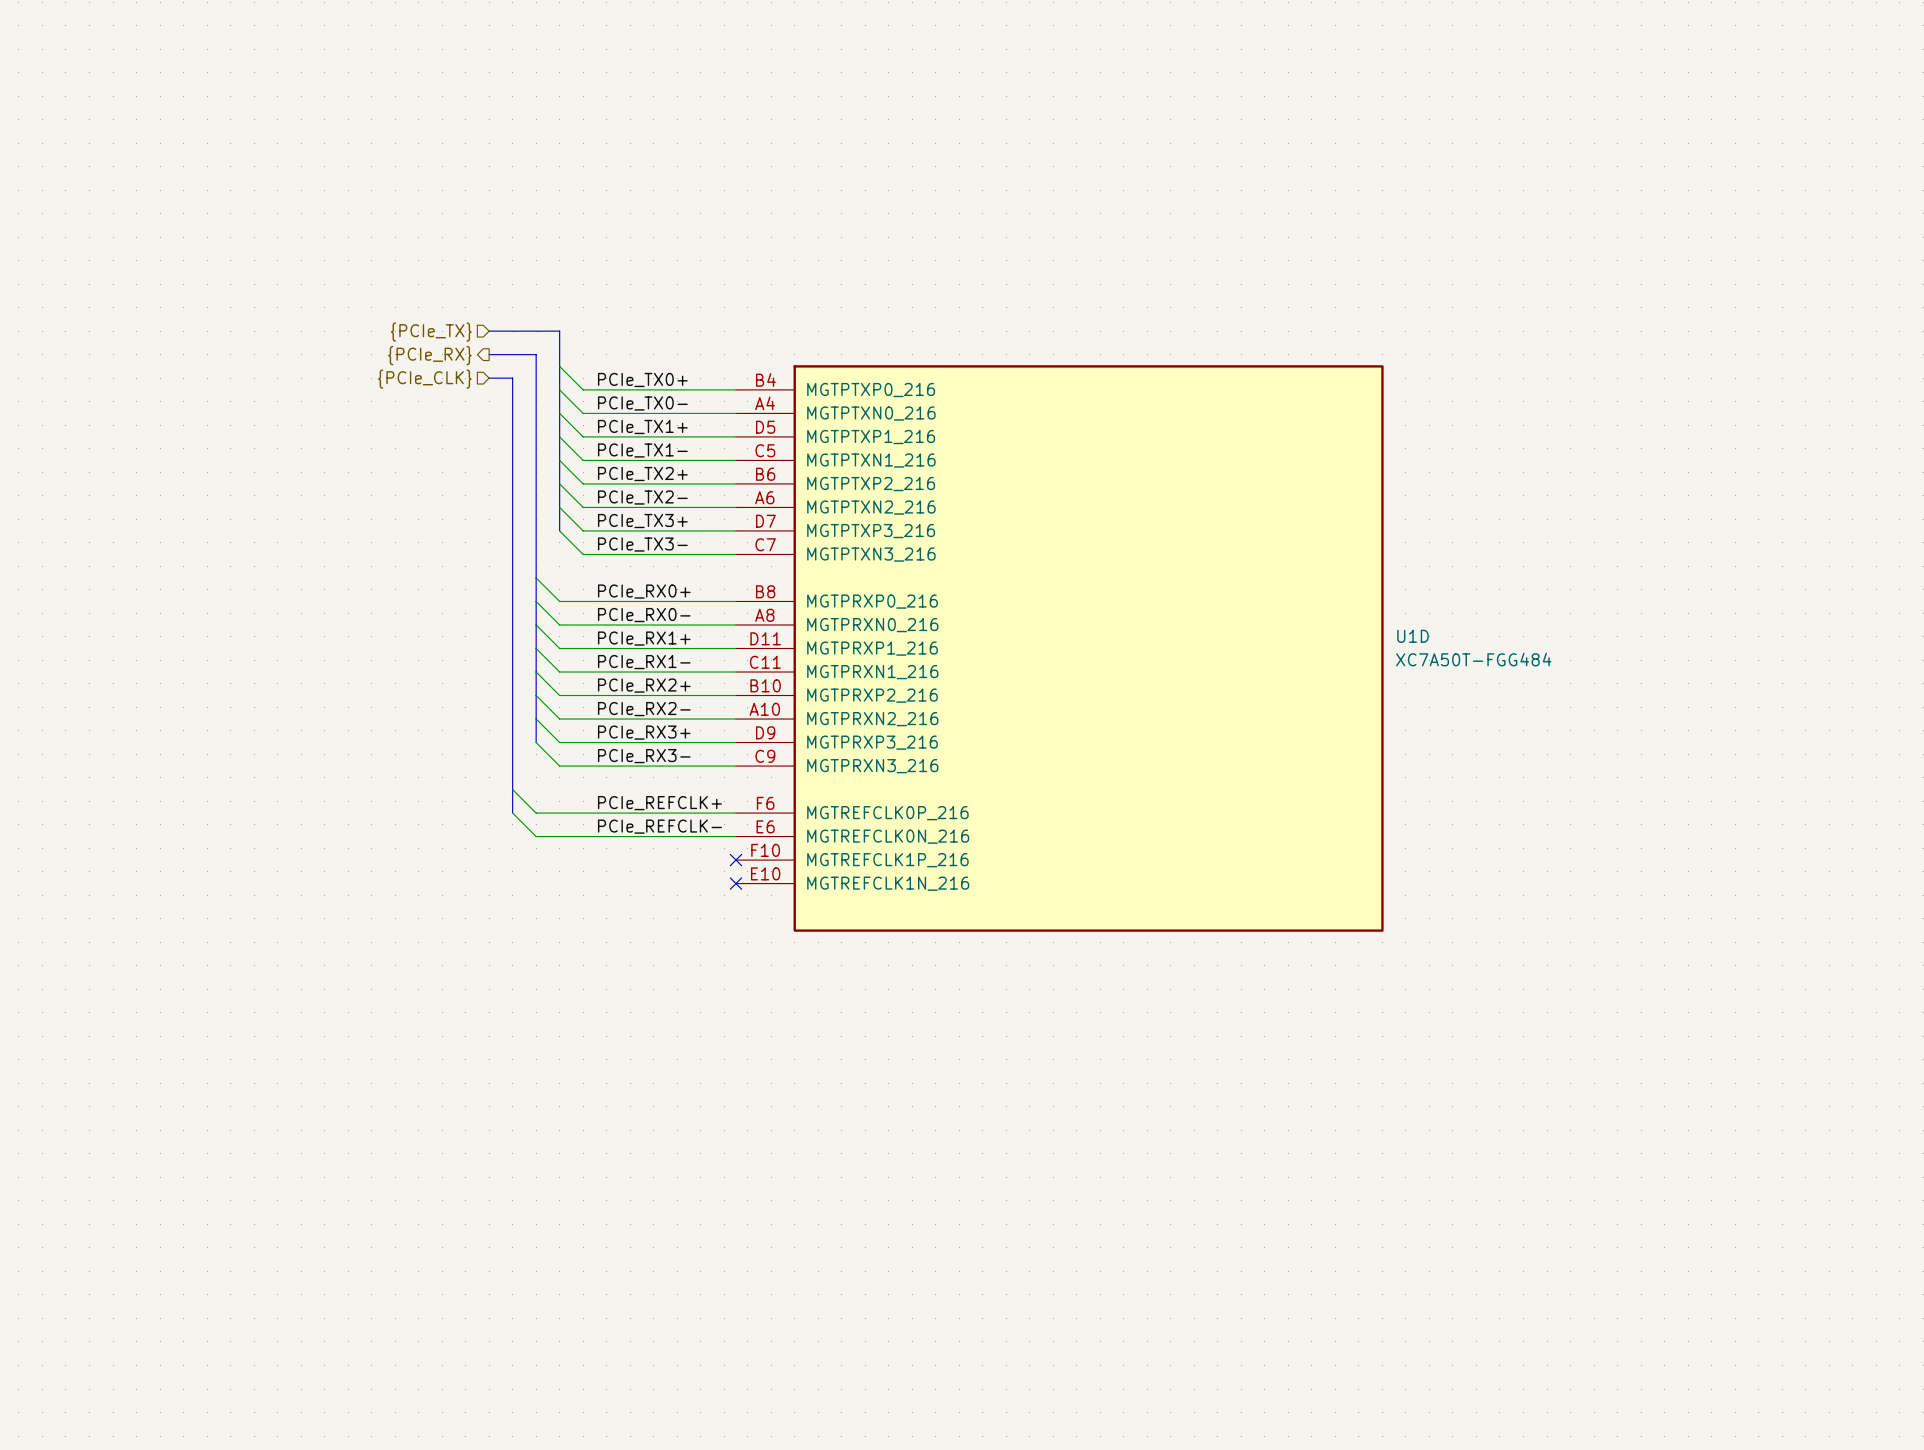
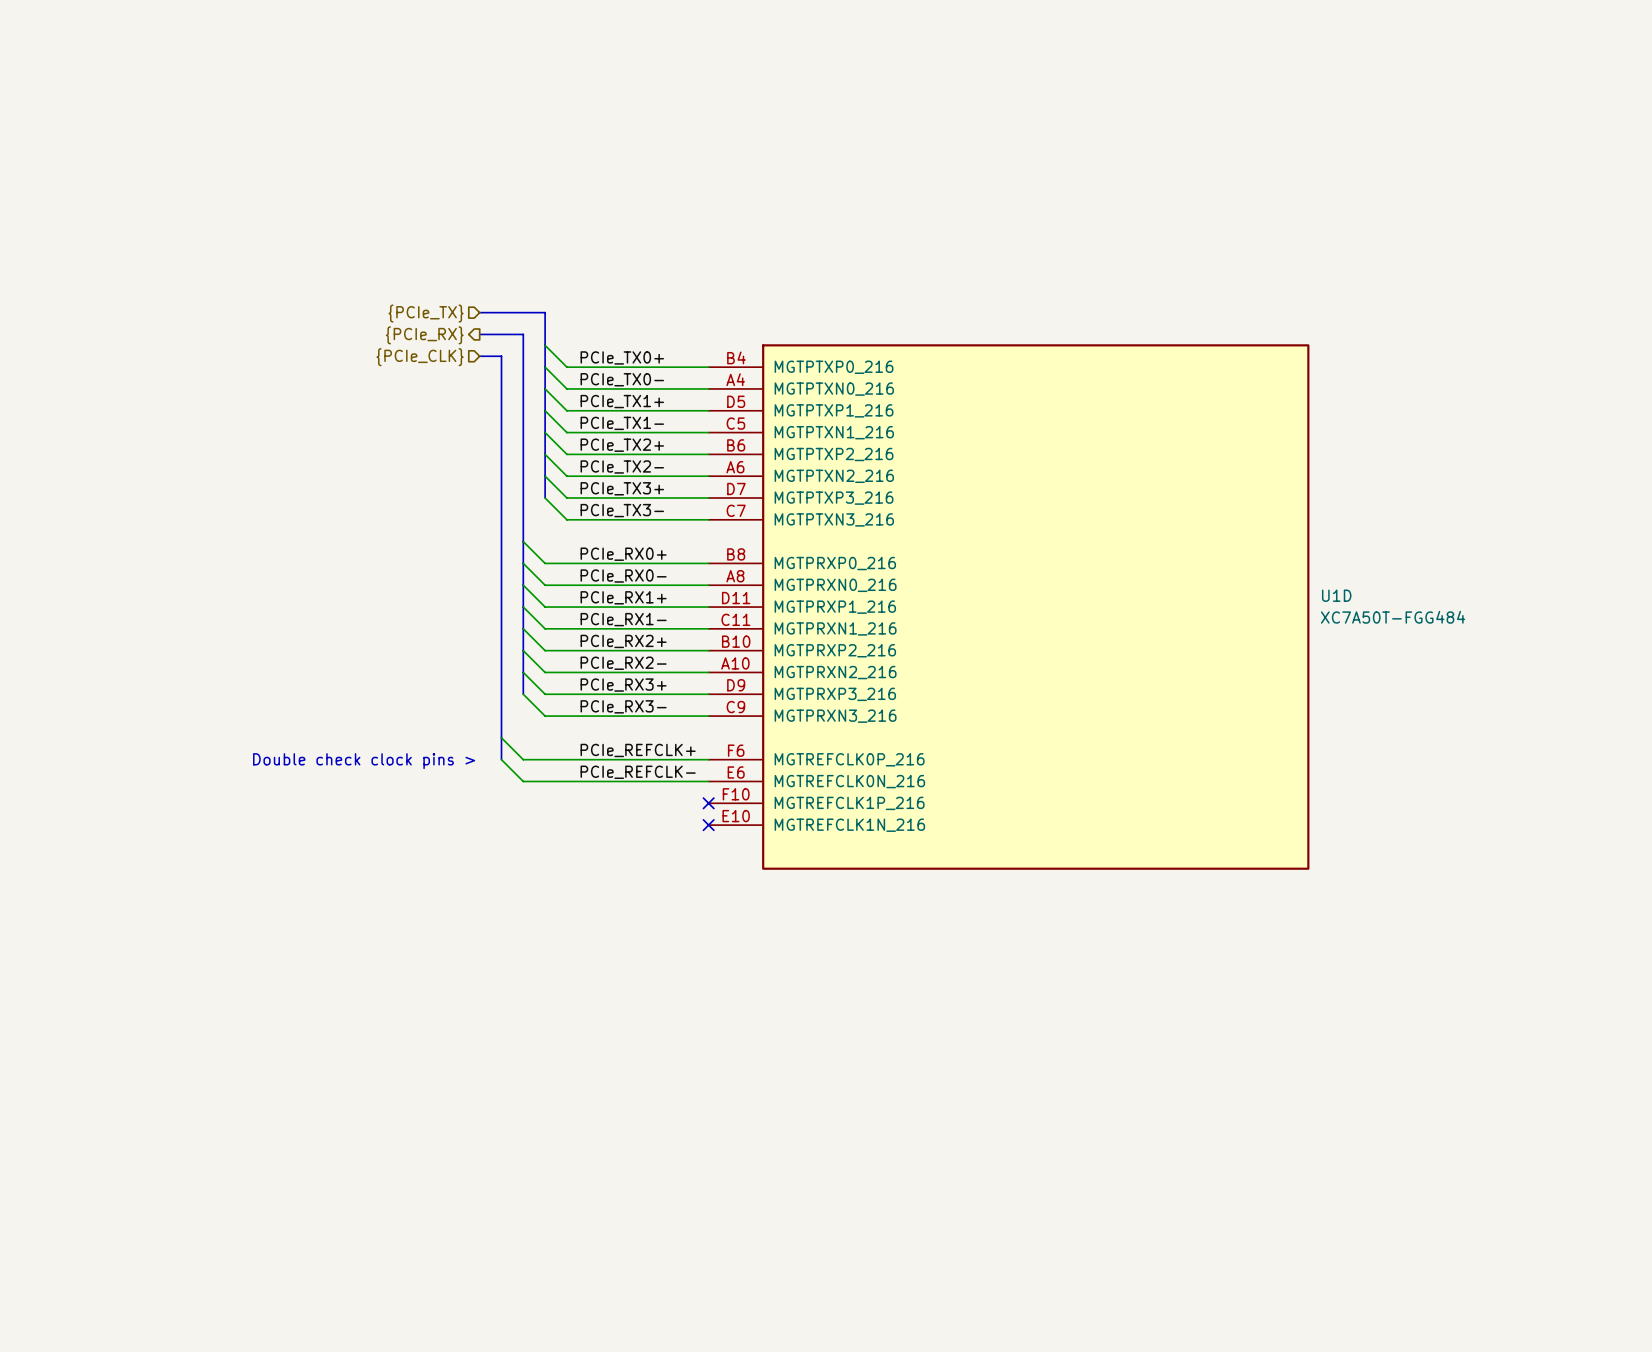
text: none -> Double check clock pins > (364, 761)

